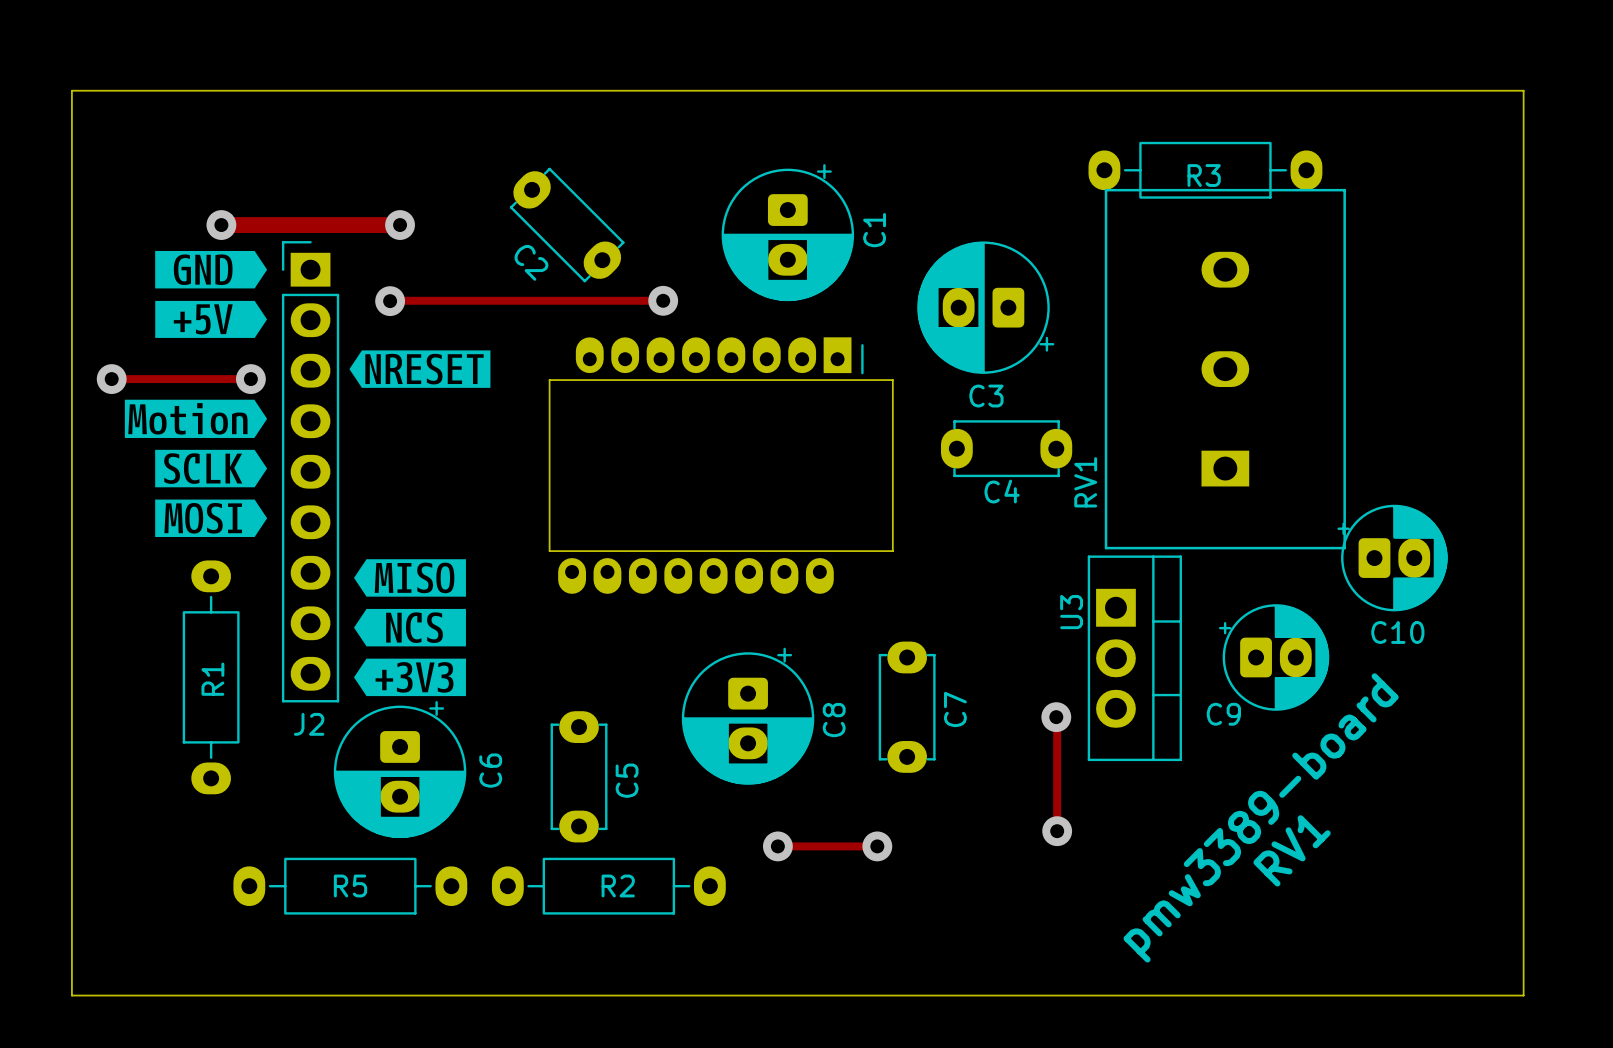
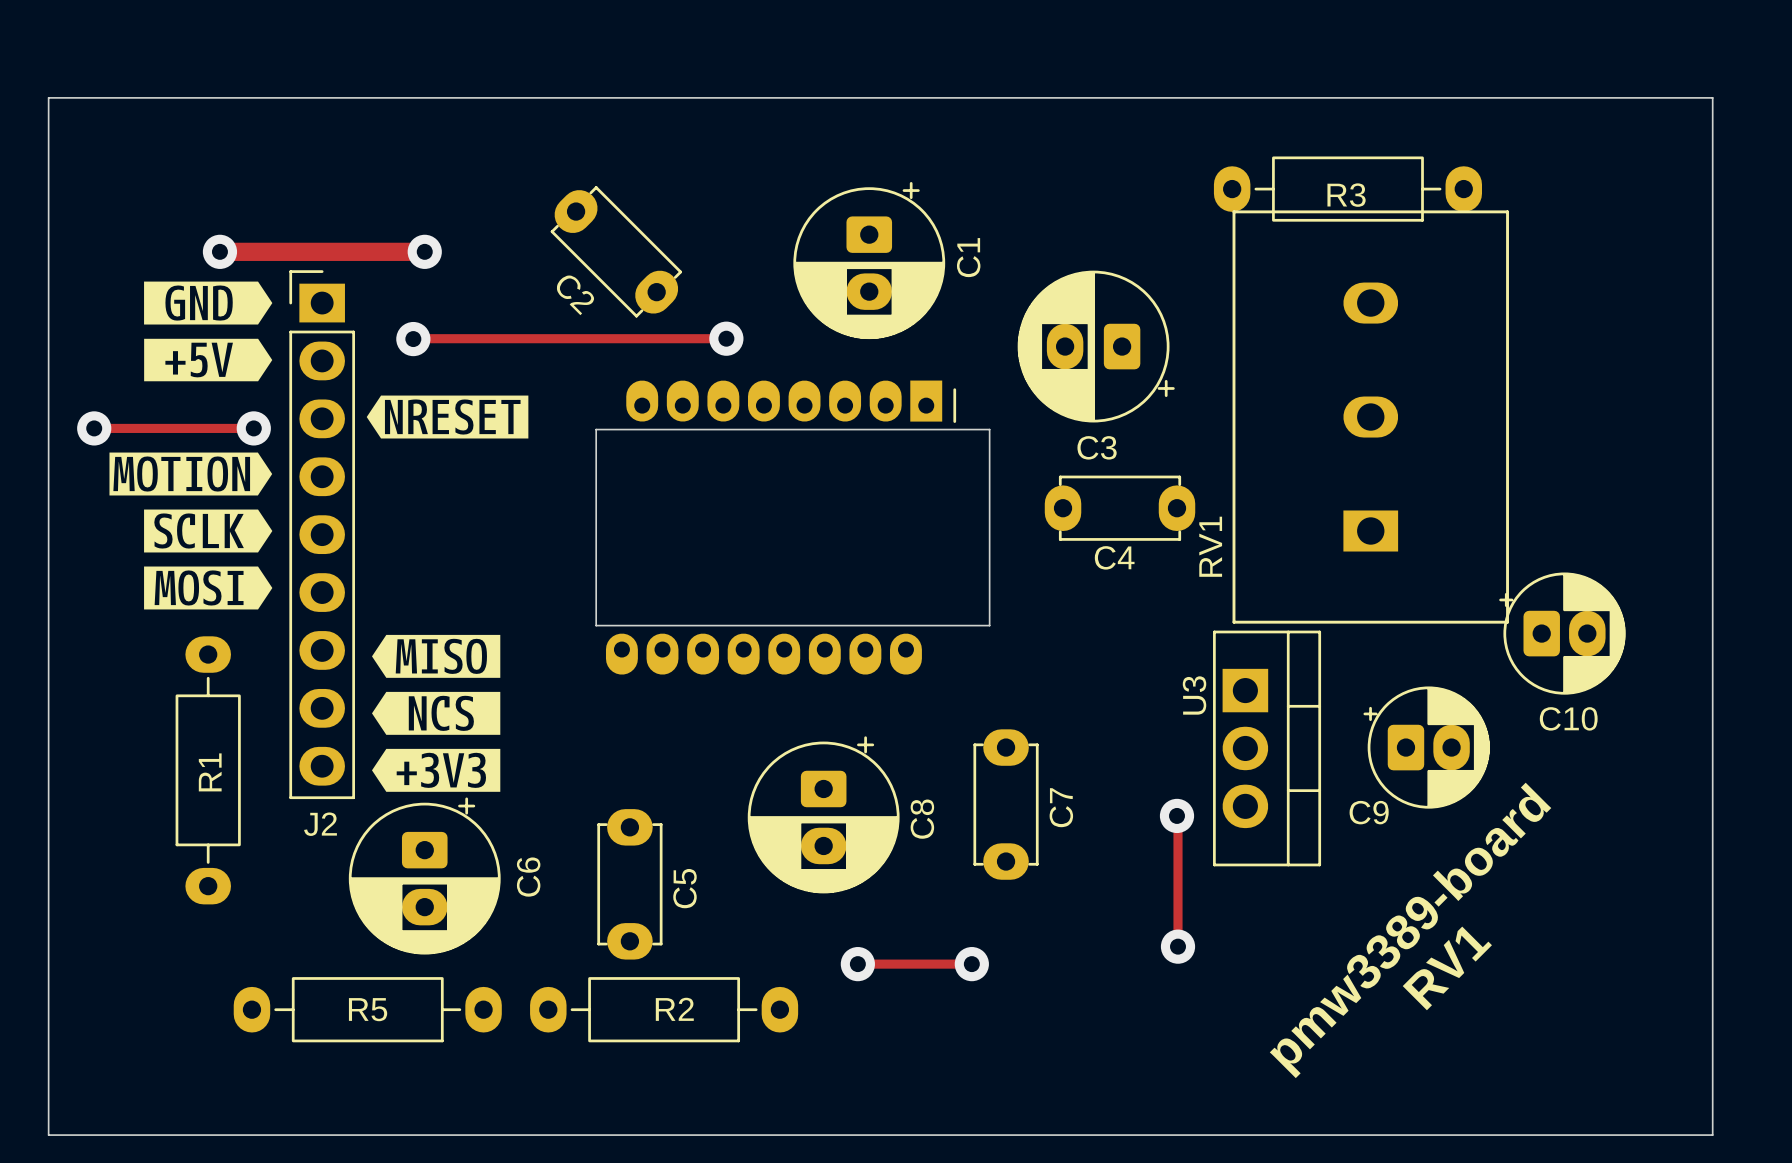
drawing shape: [124, 399, 268, 438] -> [109, 452, 273, 496]

